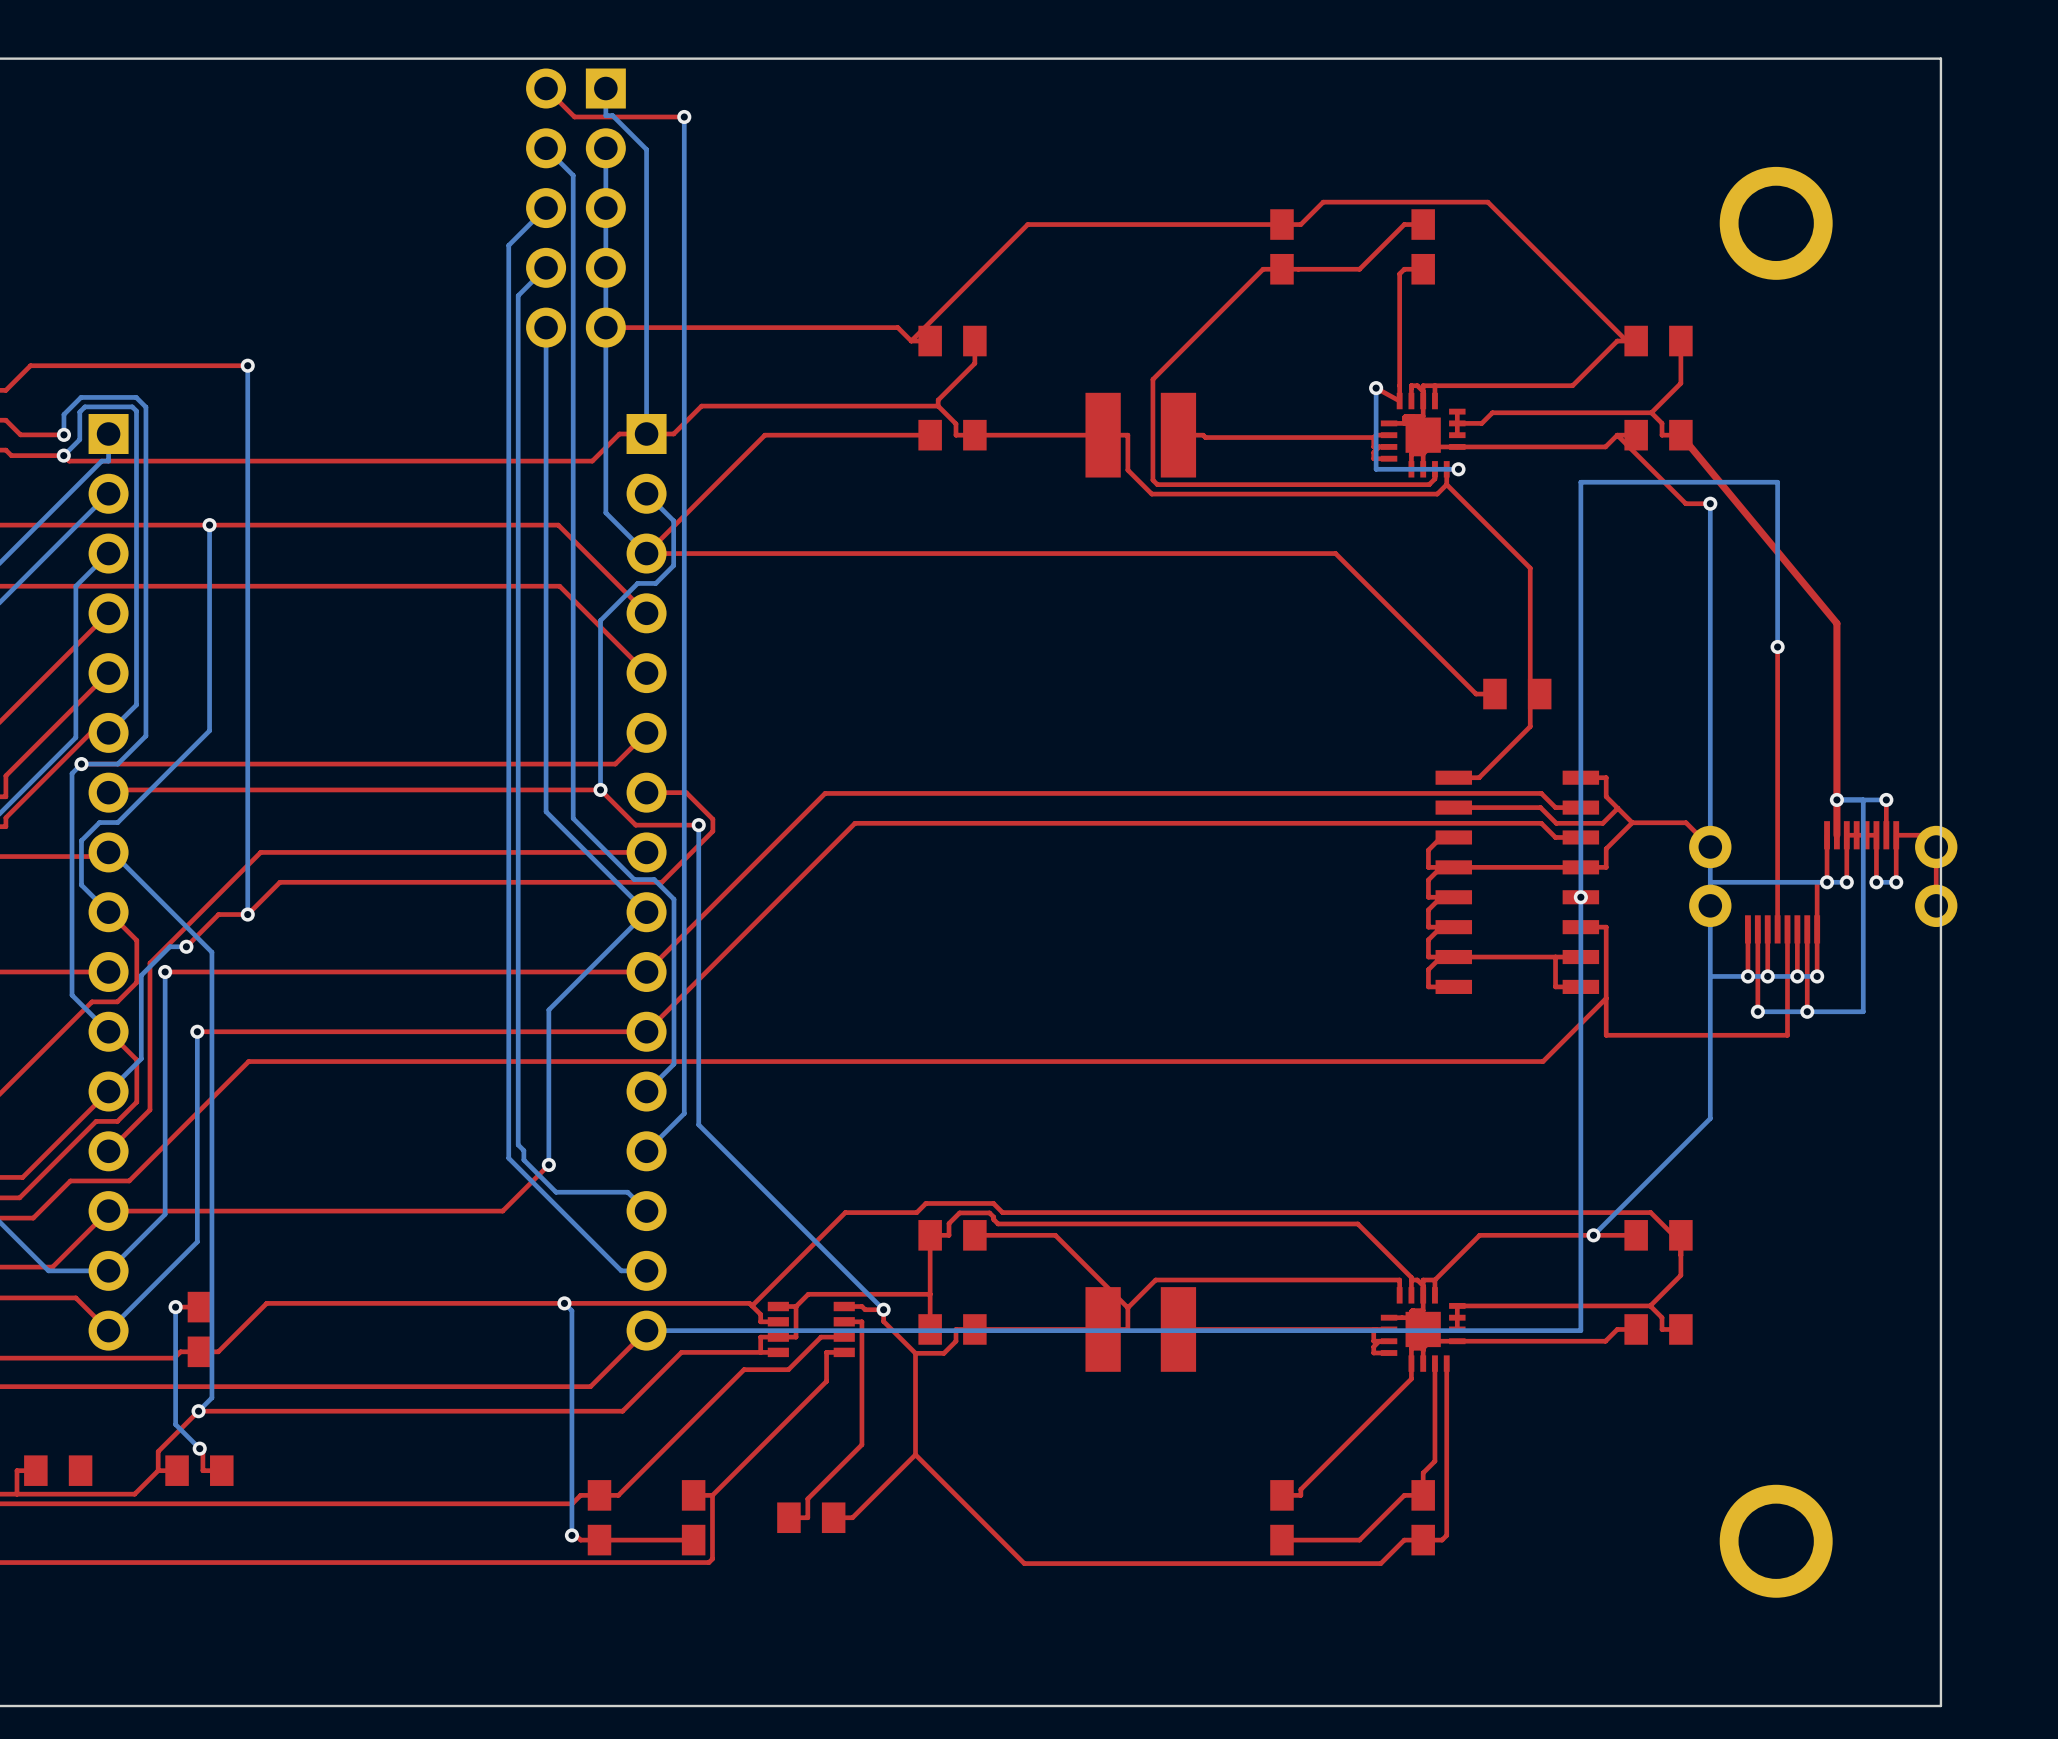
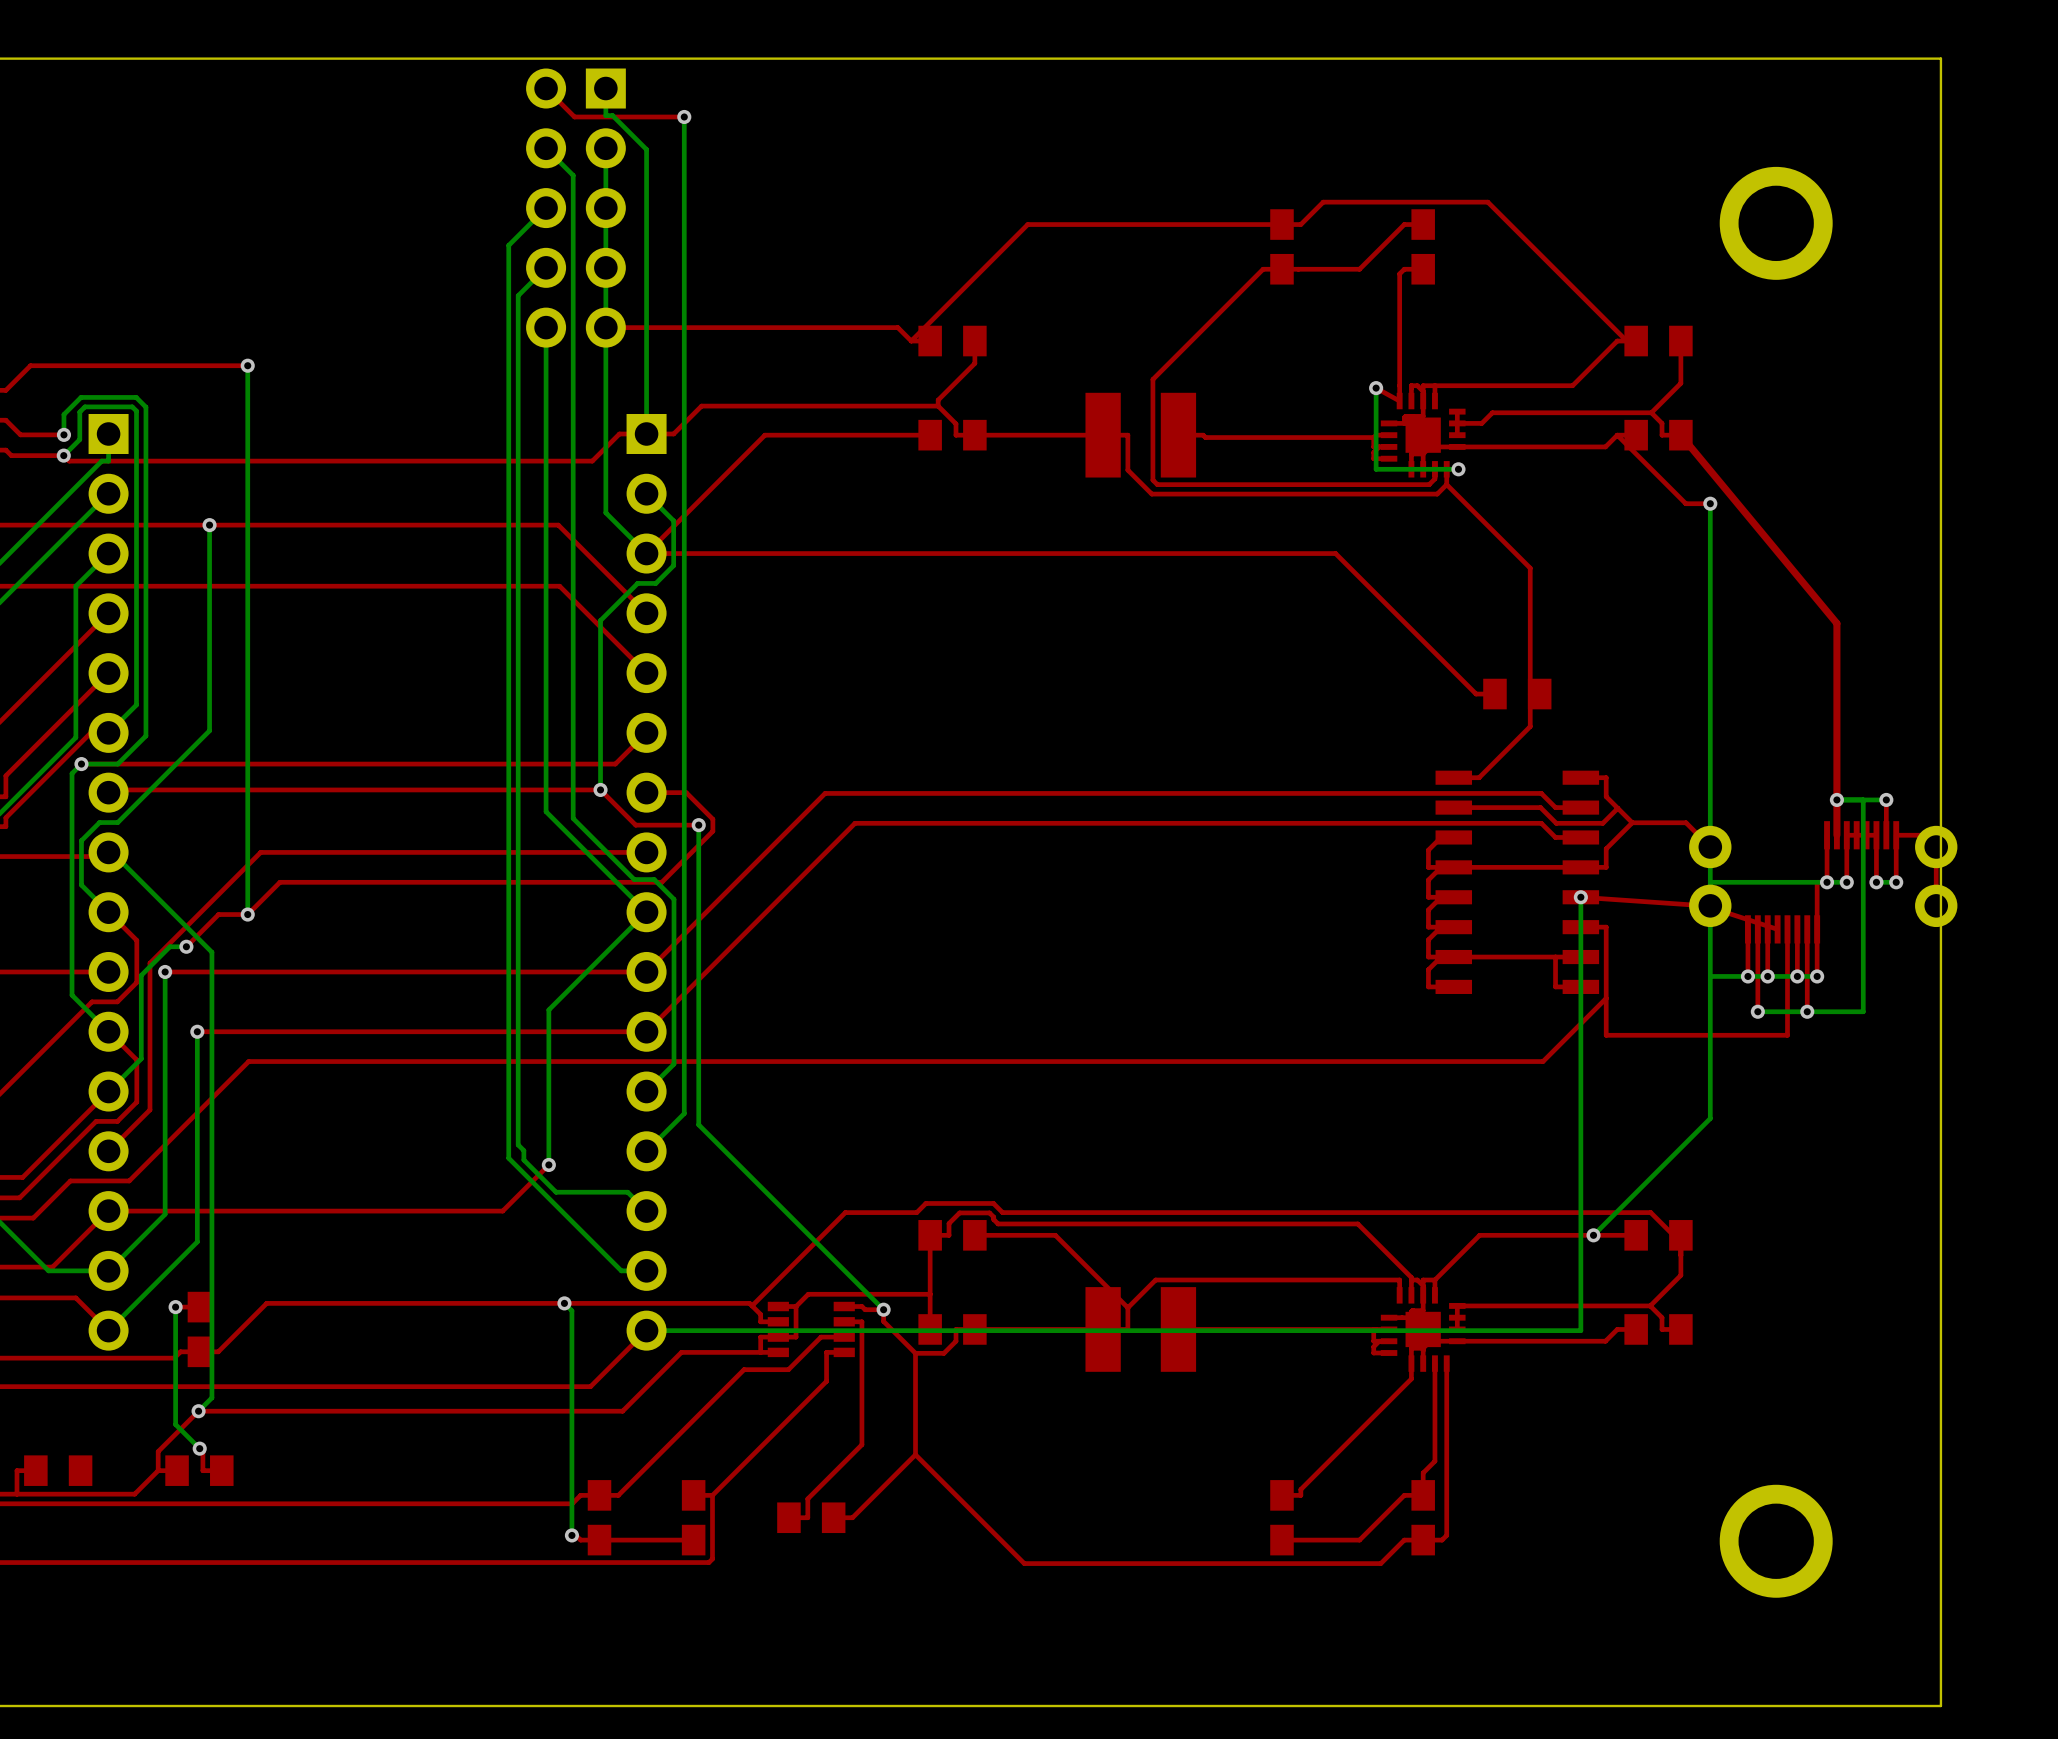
top track: (1777, 646) (1777, 929) -> (1580, 897) (1705, 905) (1777, 929)
bottom track: (1777, 646) (1777, 482) (1580, 482) (1580, 897) -> none
via: (1777, 646) -> none

